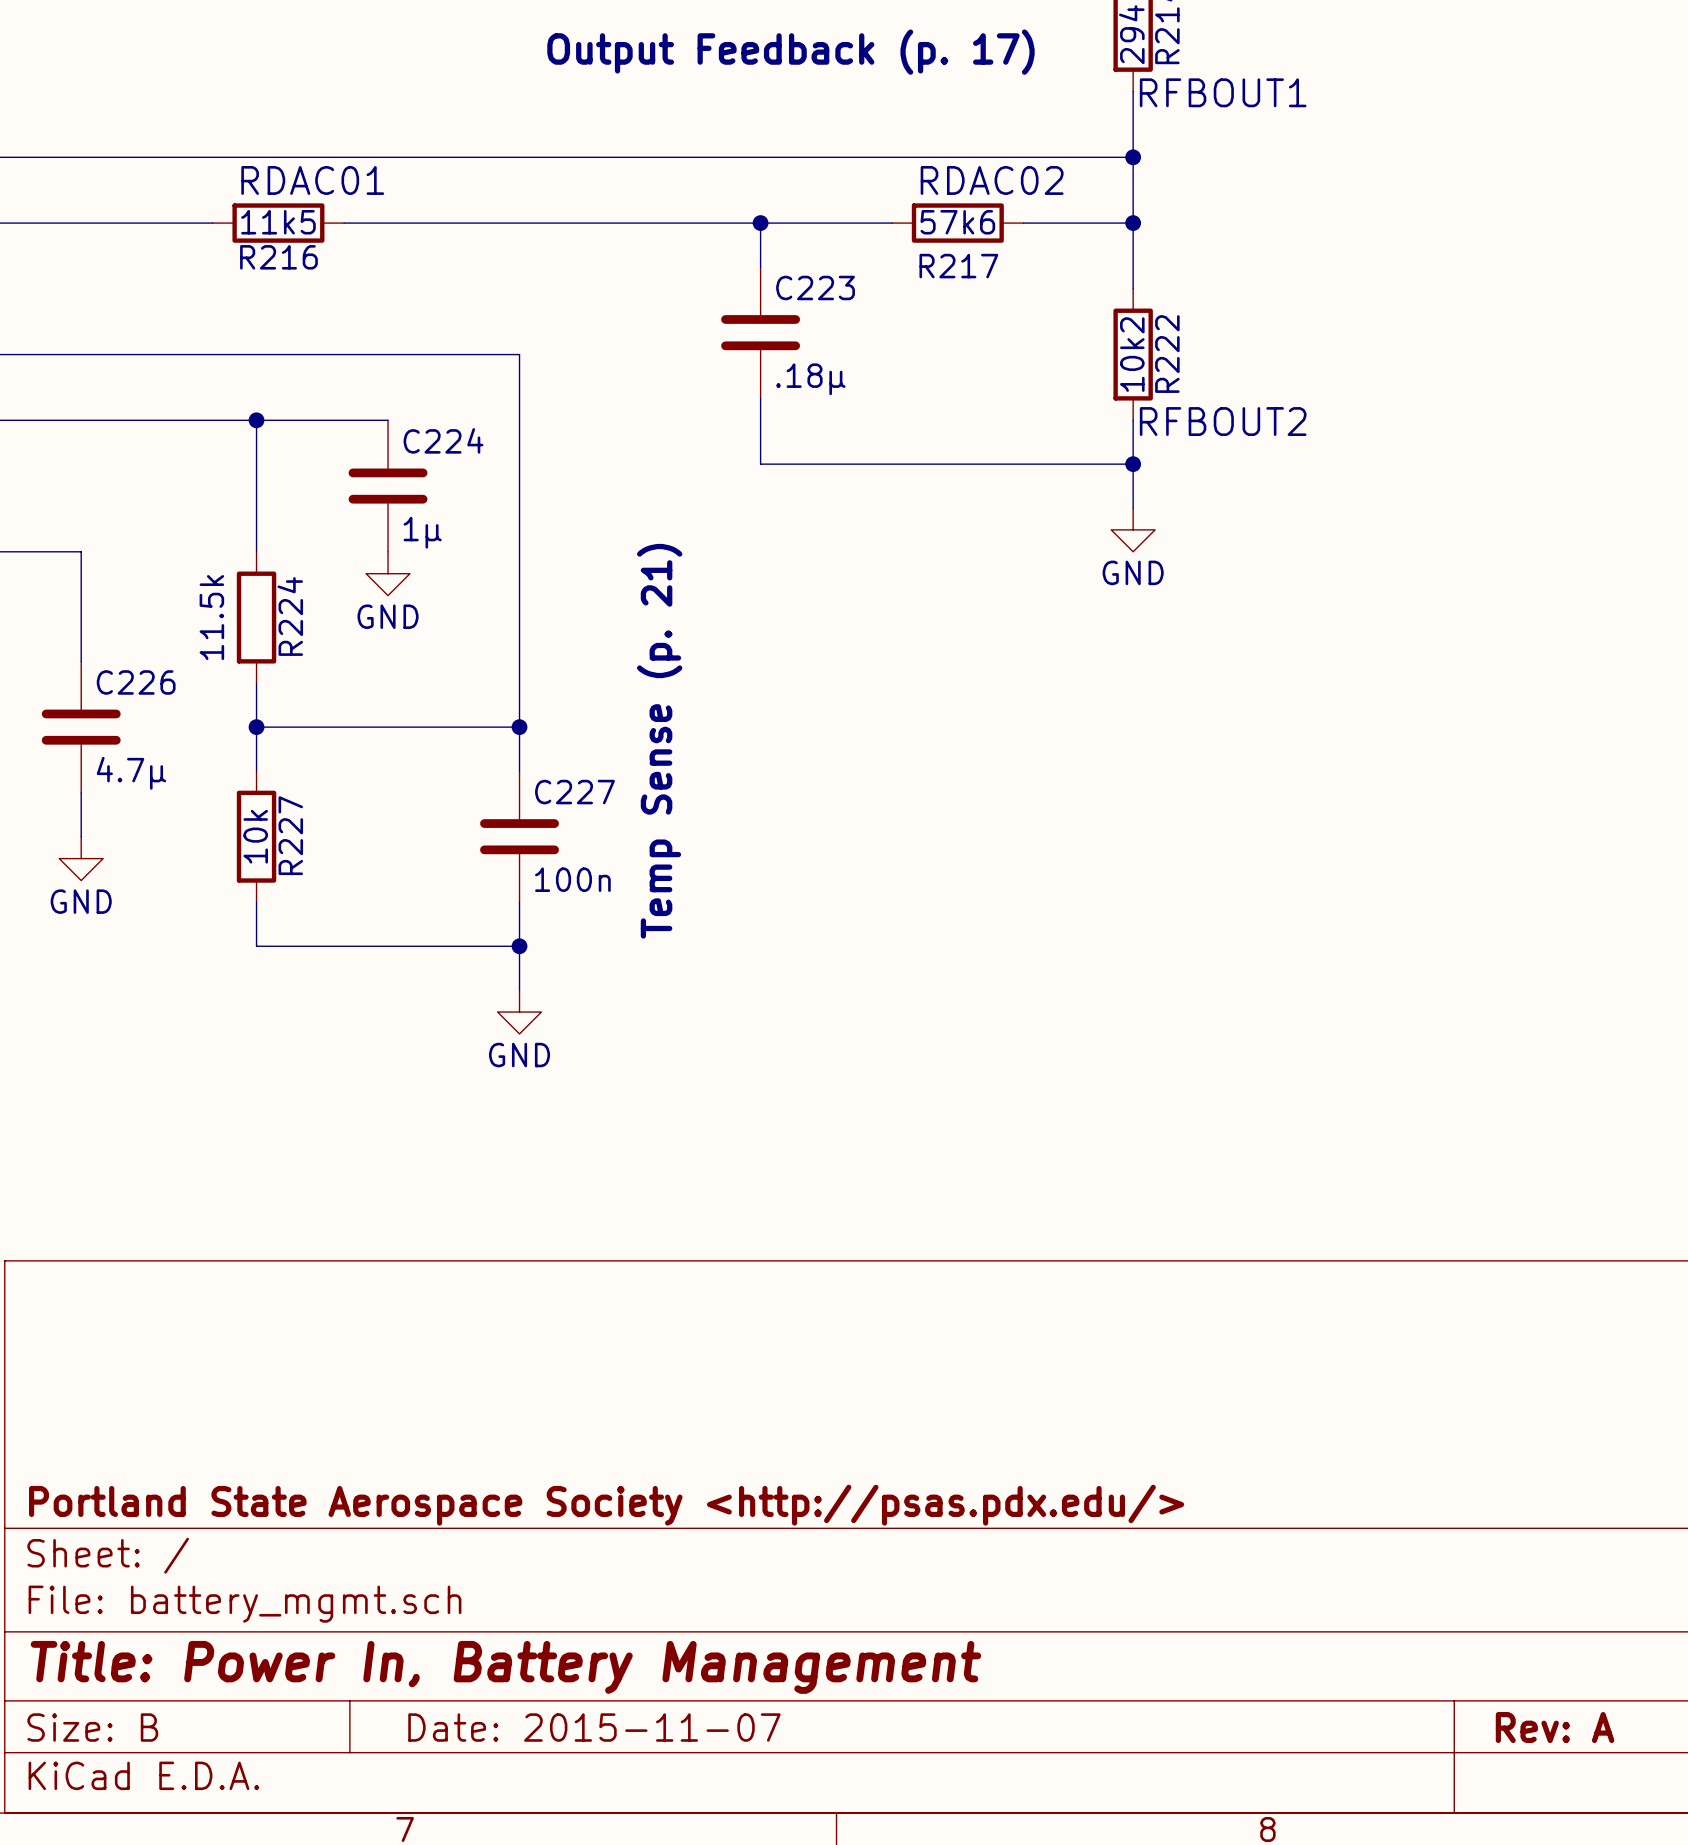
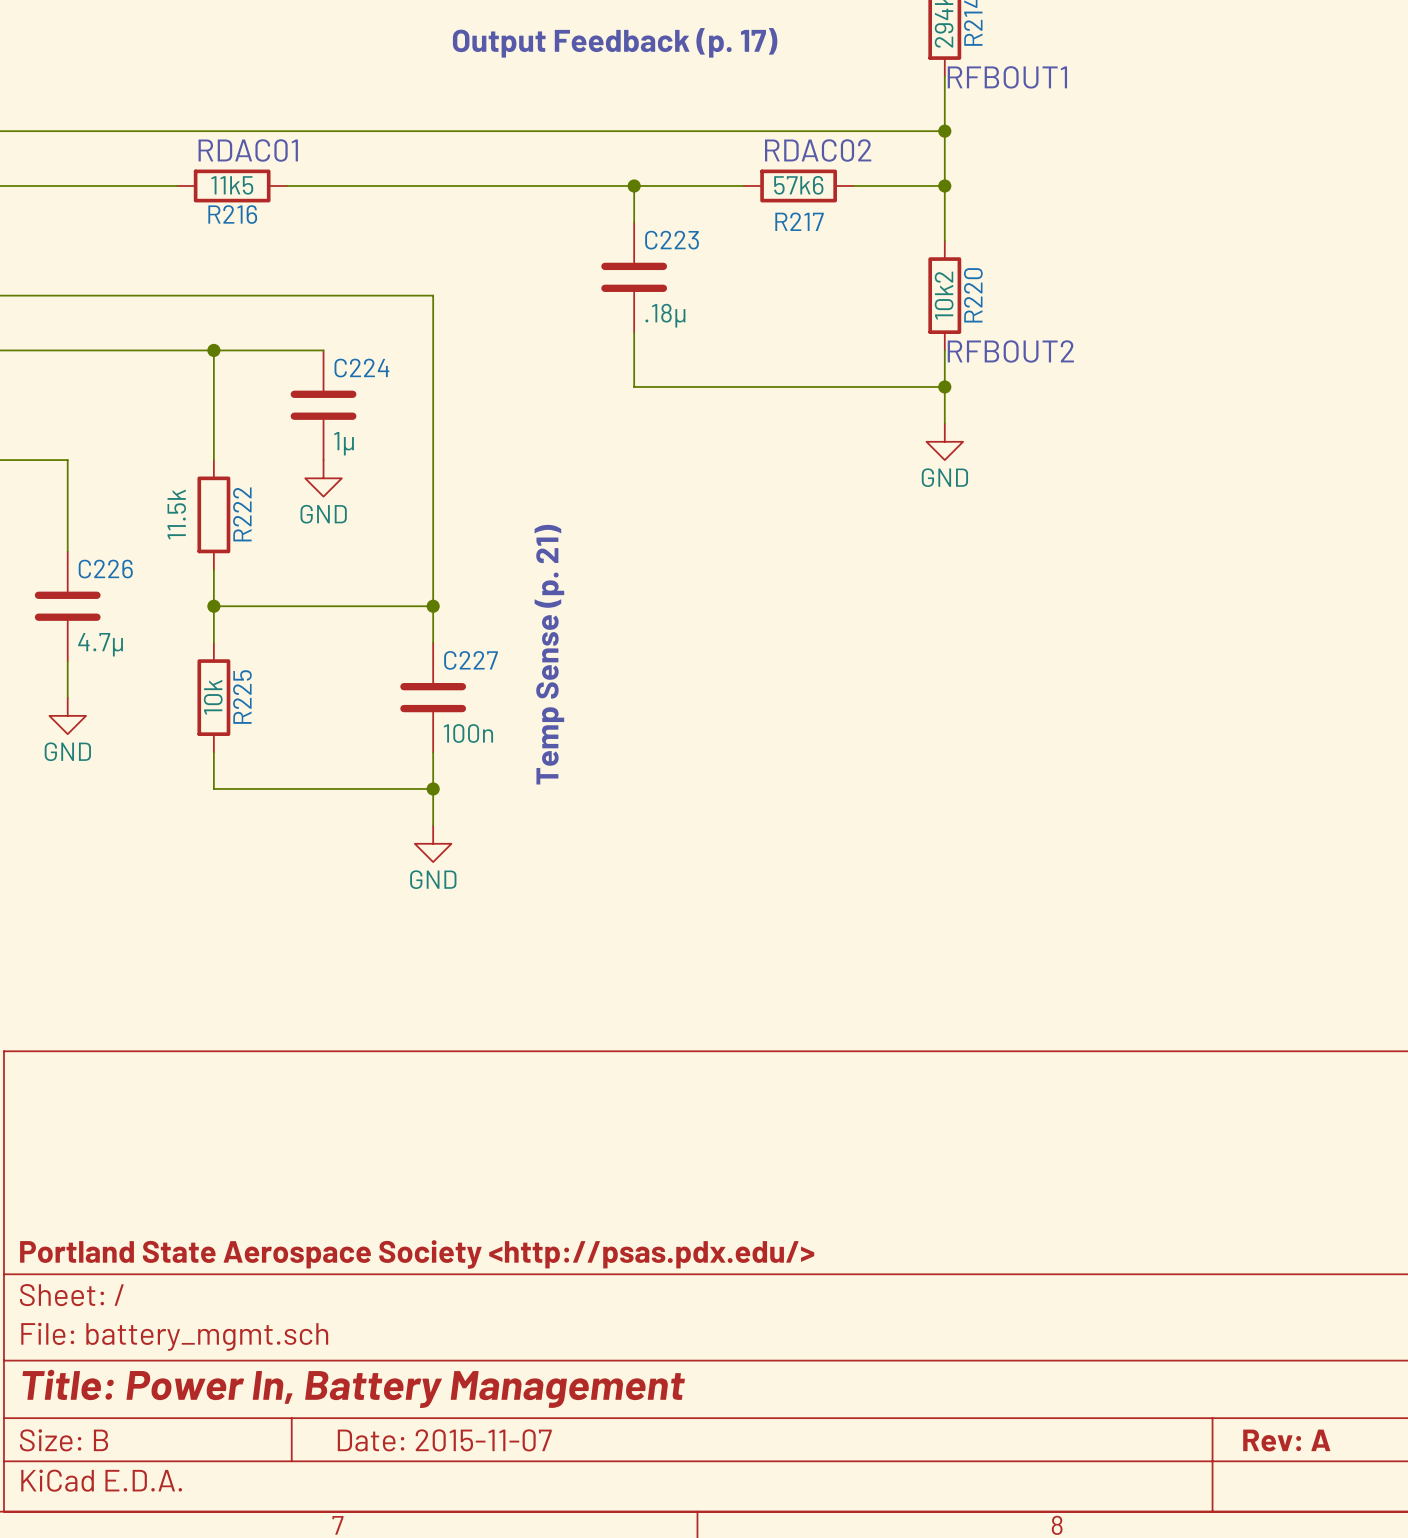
R222 name: R222 (1167, 354) -> R220 (973, 295)
R224 name: R224 (290, 616) -> R222 (242, 514)
R227 name: R227 (290, 835) -> R225 (242, 697)

